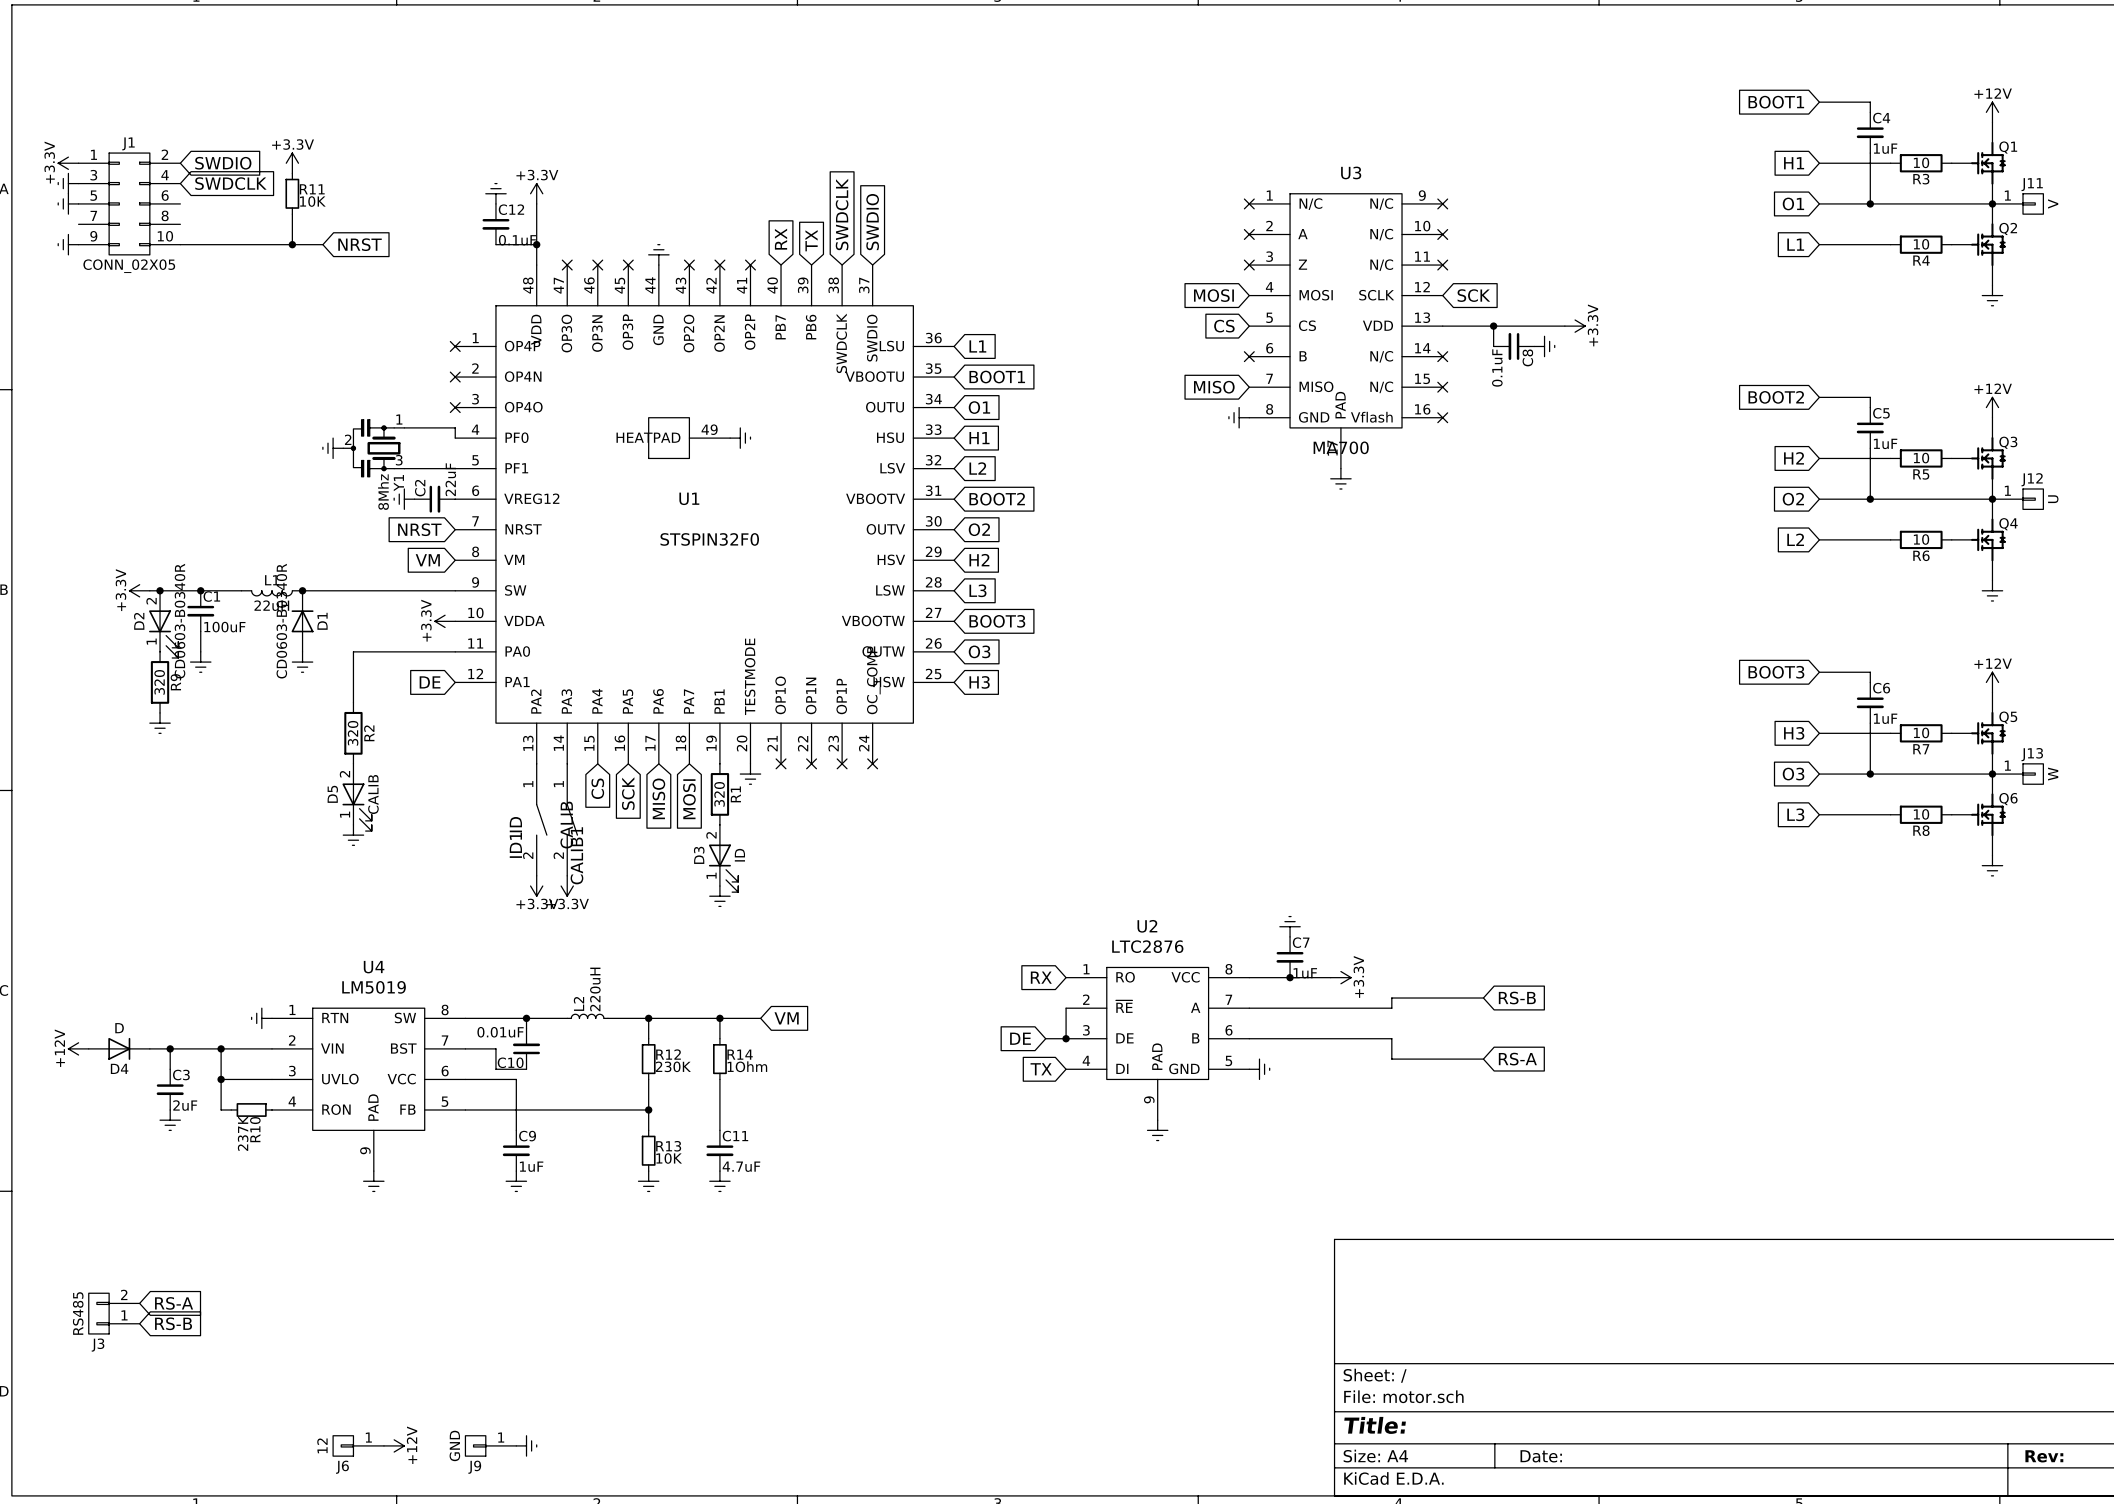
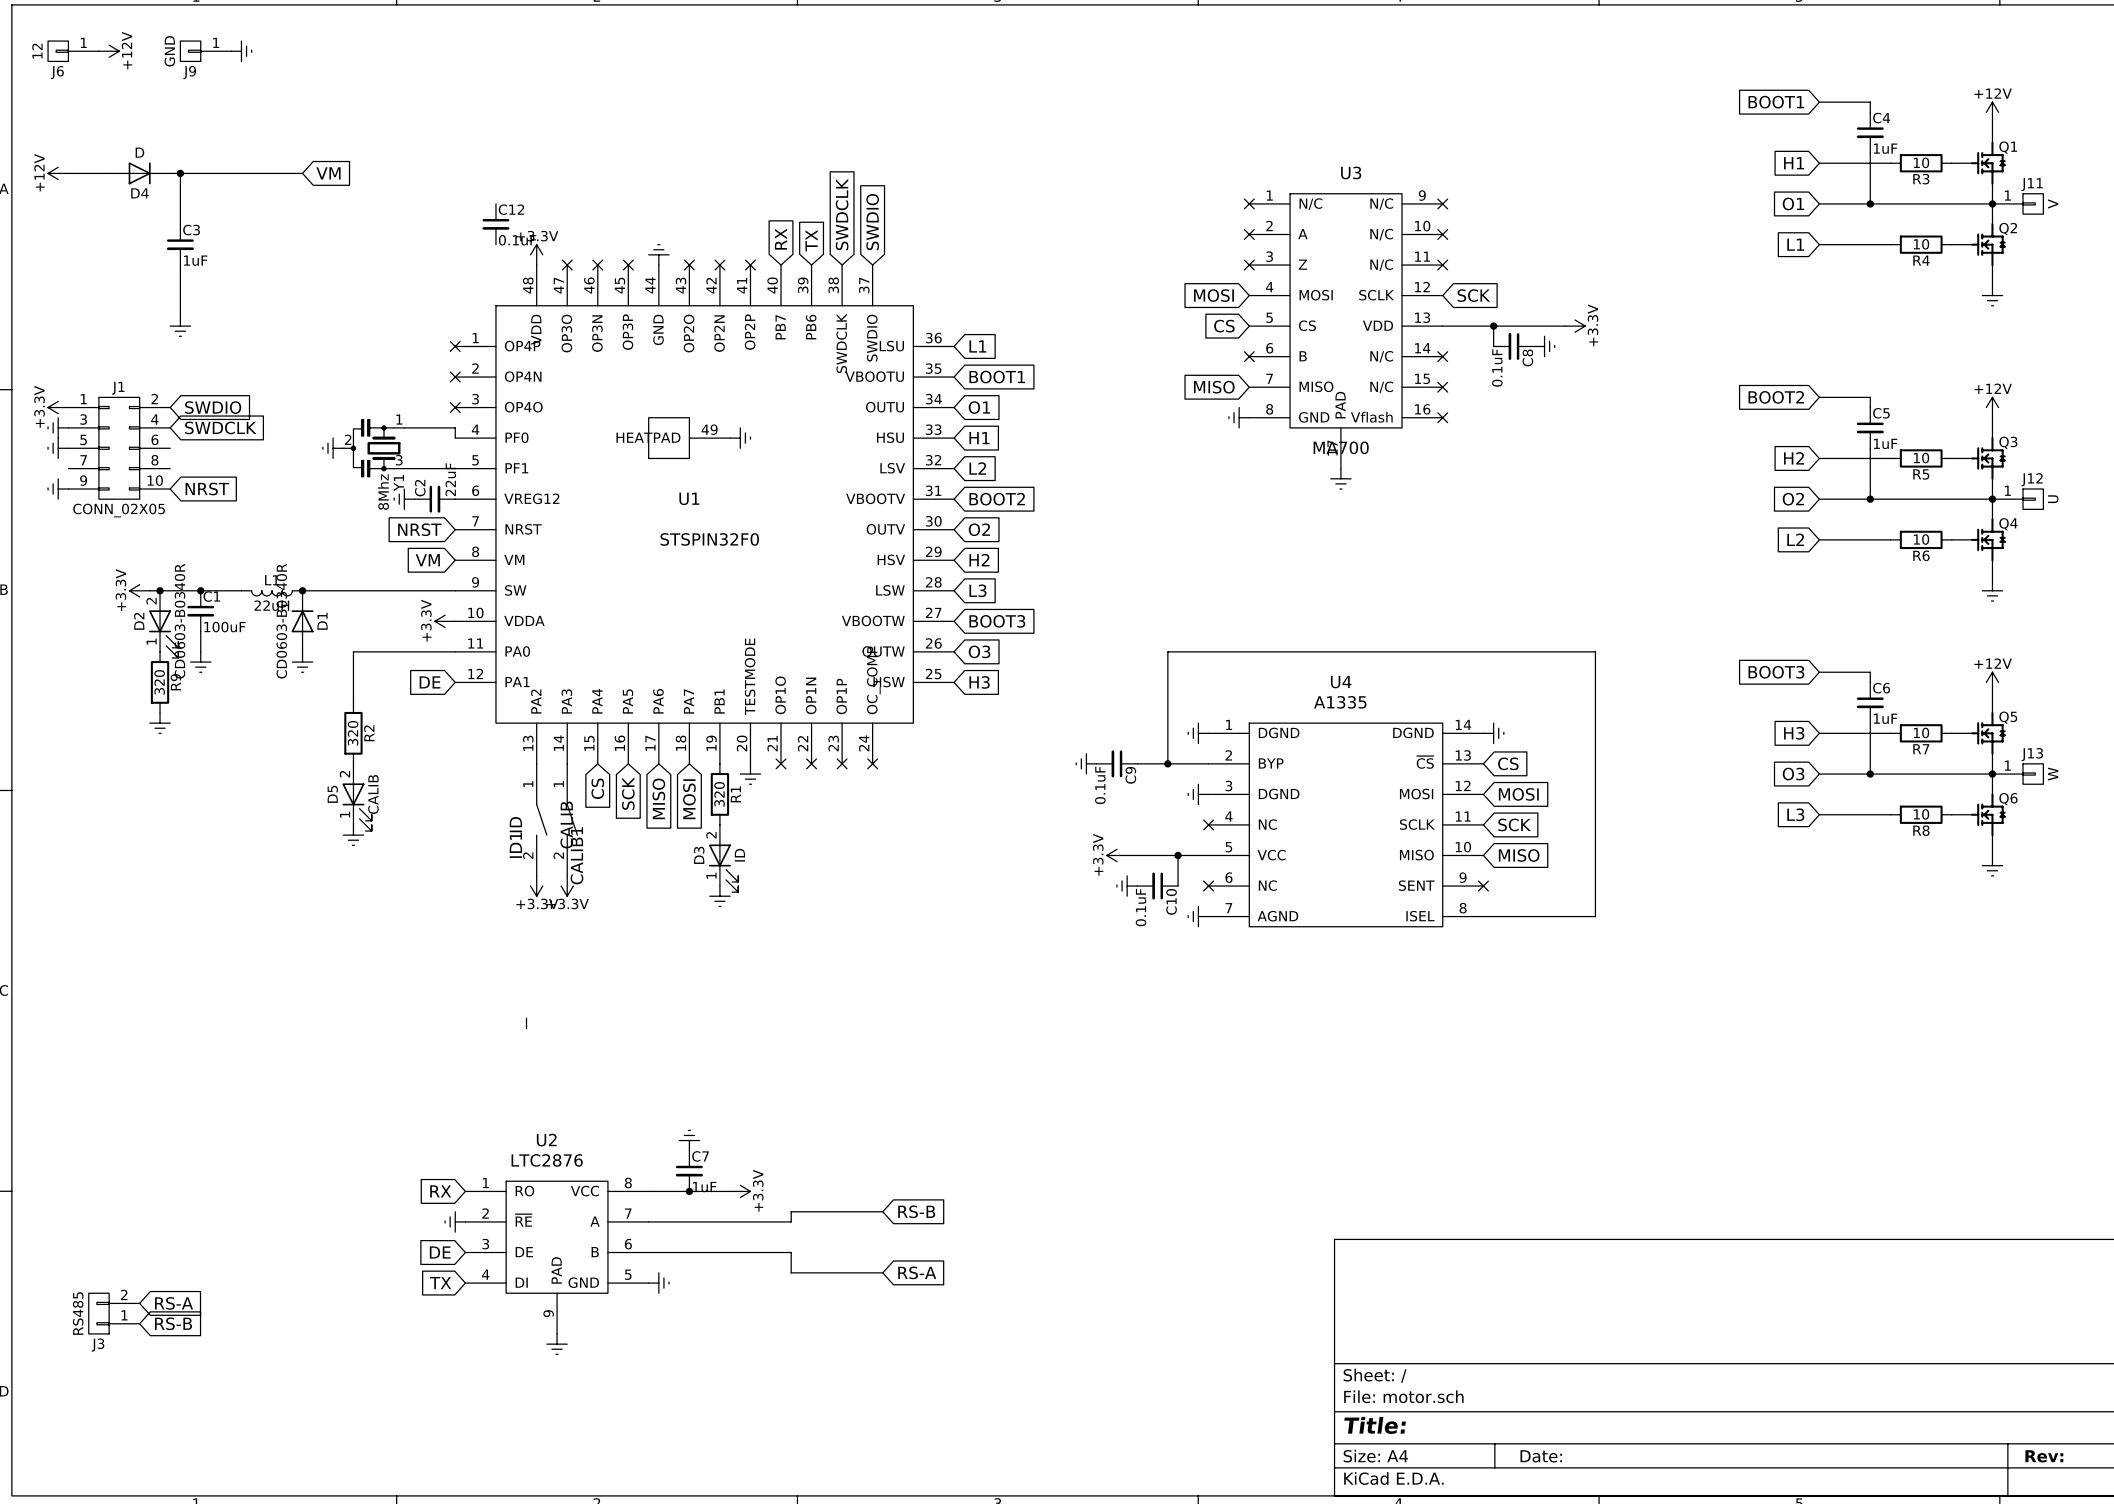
power symbol: none -> +12V (109, 51)
power symbol: none -> (241, 51)
power symbol: +3.3V (68, 163) -> none
global label: SWDIO (223, 163) -> none
power symbol: +3.3V (292, 163) -> none
power symbol: none -> +12V (58, 173)
wire: none -> (68, 173) (109, 173)
wire: none -> (170, 173) (302, 173)
wire: none -> (180, 173) (180, 224)
junction: none -> (180, 173)
global label: none -> VM (328, 173)
power symbol: (68, 183) -> none
global label: SWDCLK (230, 183) -> none
R11: 10K (292, 193) -> none
power symbol: (495, 193) -> none
power symbol position: +3.3V (536, 193) -> +3.3V (536, 254)
power symbol: (68, 203) -> none
J1 position: (129, 203) -> (119, 448)
wire: (536, 203) (536, 265) -> none
wire: (292, 214) (292, 244) -> none
power symbol: (68, 244) -> none
wire: (180, 244) (322, 244) -> none
junction: (292, 244) -> none
global label: NRST (360, 244) -> none
wire: (495, 244) (536, 244) -> none
junction: (536, 244) -> none
wire: none -> (180, 265) (180, 315)
power symbol: none -> (180, 326)
power symbol: none -> +3.3V (58, 407)
global label: none -> SWDIO (213, 407)
power symbol: none -> (58, 427)
global label: none -> SWDCLK (220, 427)
power symbol: none -> (58, 448)
power symbol: none -> (58, 489)
global label: none -> NRST (207, 489)
power symbol: none -> (1198, 733)
power symbol: none -> (1493, 733)
power symbol: none -> (1086, 763)
wire: none -> (1137, 763) (1208, 763)
wire: none -> (1167, 763) (1167, 651) (1595, 651) (1595, 916) (1483, 916)
junction: none -> (1167, 763)
global label: none -> CS (1508, 763)
power symbol: none -> (1198, 794)
global label: none -> MOSI (1518, 794)
no-connect mark: none -> (1208, 824)
global label: none -> SCK (1514, 824)
power symbol: none -> +3.3V (1116, 855)
wire: none -> (1178, 855) (1178, 886)
junction: none -> (1178, 855)
global label: none -> MISO (1519, 855)
power symbol: none -> (1127, 886)
no-connect mark: none -> (1208, 886)
no-connect mark: none -> (1483, 886)
power symbol: none -> (1198, 916)
power symbol: (1290, 926) -> none
C7 position: (1290, 957) -> (689, 1171)
U4 name position: U4 (374, 967) -> U4 (1341, 682)
global label: RX (1041, 977) -> none
wire: (1249, 977) (1330, 977) -> (1127, 855) (1208, 855)
junction: (1290, 977) -> none
power symbol: +3.3V (1340, 977) -> none
U4 value: LM5019 (374, 987) -> A1335 (1340, 702)
wire: (1483, 998) (1391, 998) (1391, 1008) (1249, 1008) -> none
global label: RS-B (1517, 998) -> none
U4 symbol: [272, 1008, 466, 1172] -> [1208, 723, 1484, 927]
wire: (1066, 1008) (1066, 1038) (1045, 1038) -> none
L2: 220uH (587, 1016) -> none
power symbol: (261, 1018) -> none
wire: (465, 1018) (567, 1018) -> none
junction: (526, 1018) -> none
wire: (607, 1018) (760, 1018) -> none
wire: (648, 1018) (648, 1038) -> none
junction: (648, 1018) -> none
wire: (719, 1018) (719, 1038) -> none
junction: (719, 1018) -> none
global label: VM (786, 1018) -> none
C10 value: 0.01uF (500, 1032) -> 0.1uF (1141, 907)
global label: DE (1020, 1038) -> none
junction: (1066, 1038) -> none
wire: (1249, 1038) (1391, 1038) (1391, 1059) (1483, 1059) -> none
U2 position: (1157, 1043) -> (557, 1257)
power symbol: +12V (78, 1048) -> none
D4 position: (119, 1048) -> (139, 173)
wire: (149, 1048) (272, 1048) -> none
wire: (170, 1048) (170, 1069) -> none
junction: (170, 1048) -> none
wire: (221, 1048) (221, 1109) (231, 1109) -> none
junction: (221, 1048) -> none
wire: (465, 1048) (495, 1048) (495, 1069) (526, 1069) -> none
C10 rotation: 0° (526, 1048) -> 90° counterclockwise (1157, 886)
C10 position: (526, 1048) -> (1157, 886)
R12: 230K (648, 1059) -> none
R14: 1Ohm (719, 1059) -> none
global label: RS-A (1517, 1059) -> none
global label: TX (1041, 1069) -> none
power symbol: (1259, 1069) -> none
wire: (221, 1079) (272, 1079) -> none
junction: (221, 1079) -> none
wire: (465, 1079) (516, 1079) (516, 1130) -> none
wire: (648, 1079) (648, 1130) -> none
wire: (719, 1079) (719, 1130) -> none
C3 position: (170, 1089) -> (180, 244)
C3 value: 2uF (185, 1105) -> 1uF (195, 260)
R10: 237K (251, 1109) -> none
wire: (465, 1109) (648, 1109) -> none
junction: (648, 1109) -> none
power symbol: (170, 1120) -> none
power symbol: (1157, 1130) -> none
power symbol: none -> (689, 1140)
C9 rotation: 0° (516, 1150) -> 90° clockwise (1116, 763)
C9 position: (516, 1150) -> (1116, 763)
R13: 10K (648, 1150) -> none
C11: 4.7uF (719, 1150) -> none
C9 value: 1uF (531, 1166) -> 0.1uF (1100, 785)
power symbol: (373, 1181) -> none
power symbol: (516, 1181) -> none
power symbol: (648, 1181) -> none
power symbol: (719, 1181) -> none
global label: none -> RX (440, 1191)
wire: none -> (648, 1191) (730, 1191)
junction: none -> (689, 1191)
power symbol: none -> +3.3V (740, 1191)
wire: none -> (882, 1211) (791, 1211) (791, 1221) (648, 1221)
global label: none -> RS-B (916, 1211)
power symbol: none -> (455, 1221)
global label: none -> DE (440, 1252)
wire: none -> (648, 1252) (791, 1252) (791, 1272) (882, 1272)
global label: none -> RS-A (917, 1272)
global label: none -> TX (440, 1283)
power symbol: none -> (658, 1283)
power symbol: none -> (557, 1344)
J6 position: (358, 1445) -> (73, 51)
power symbol: +12V (394, 1445) -> none
J9 position: (490, 1445) -> (205, 51)
power symbol: (526, 1445) -> none

